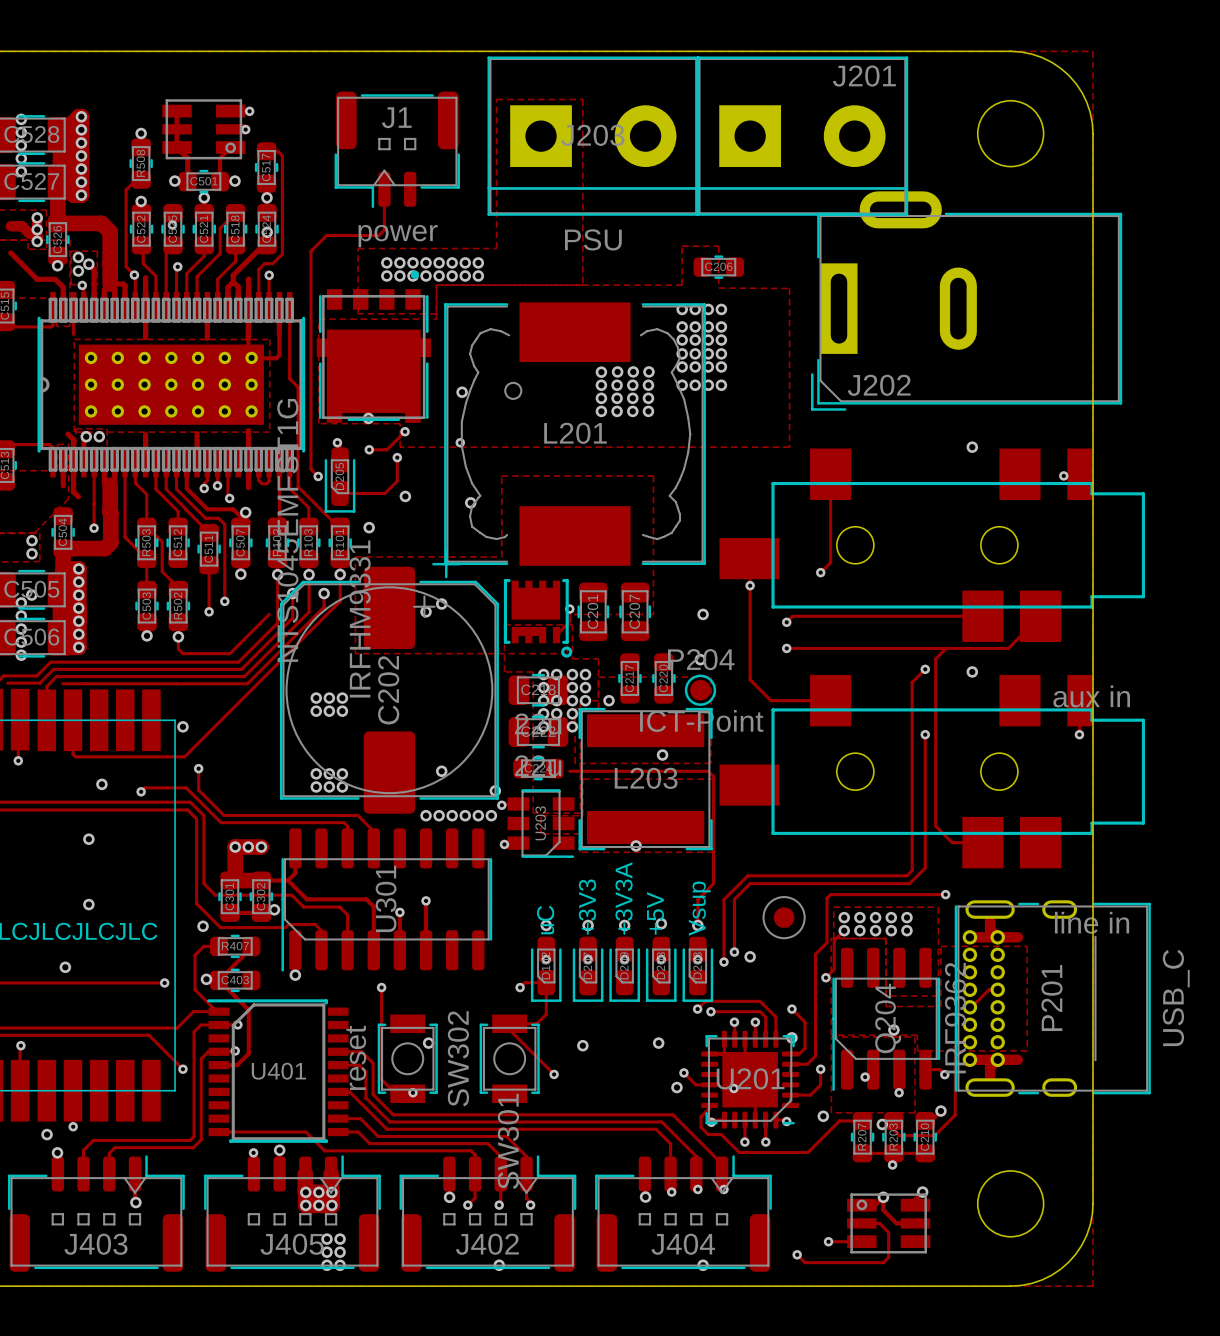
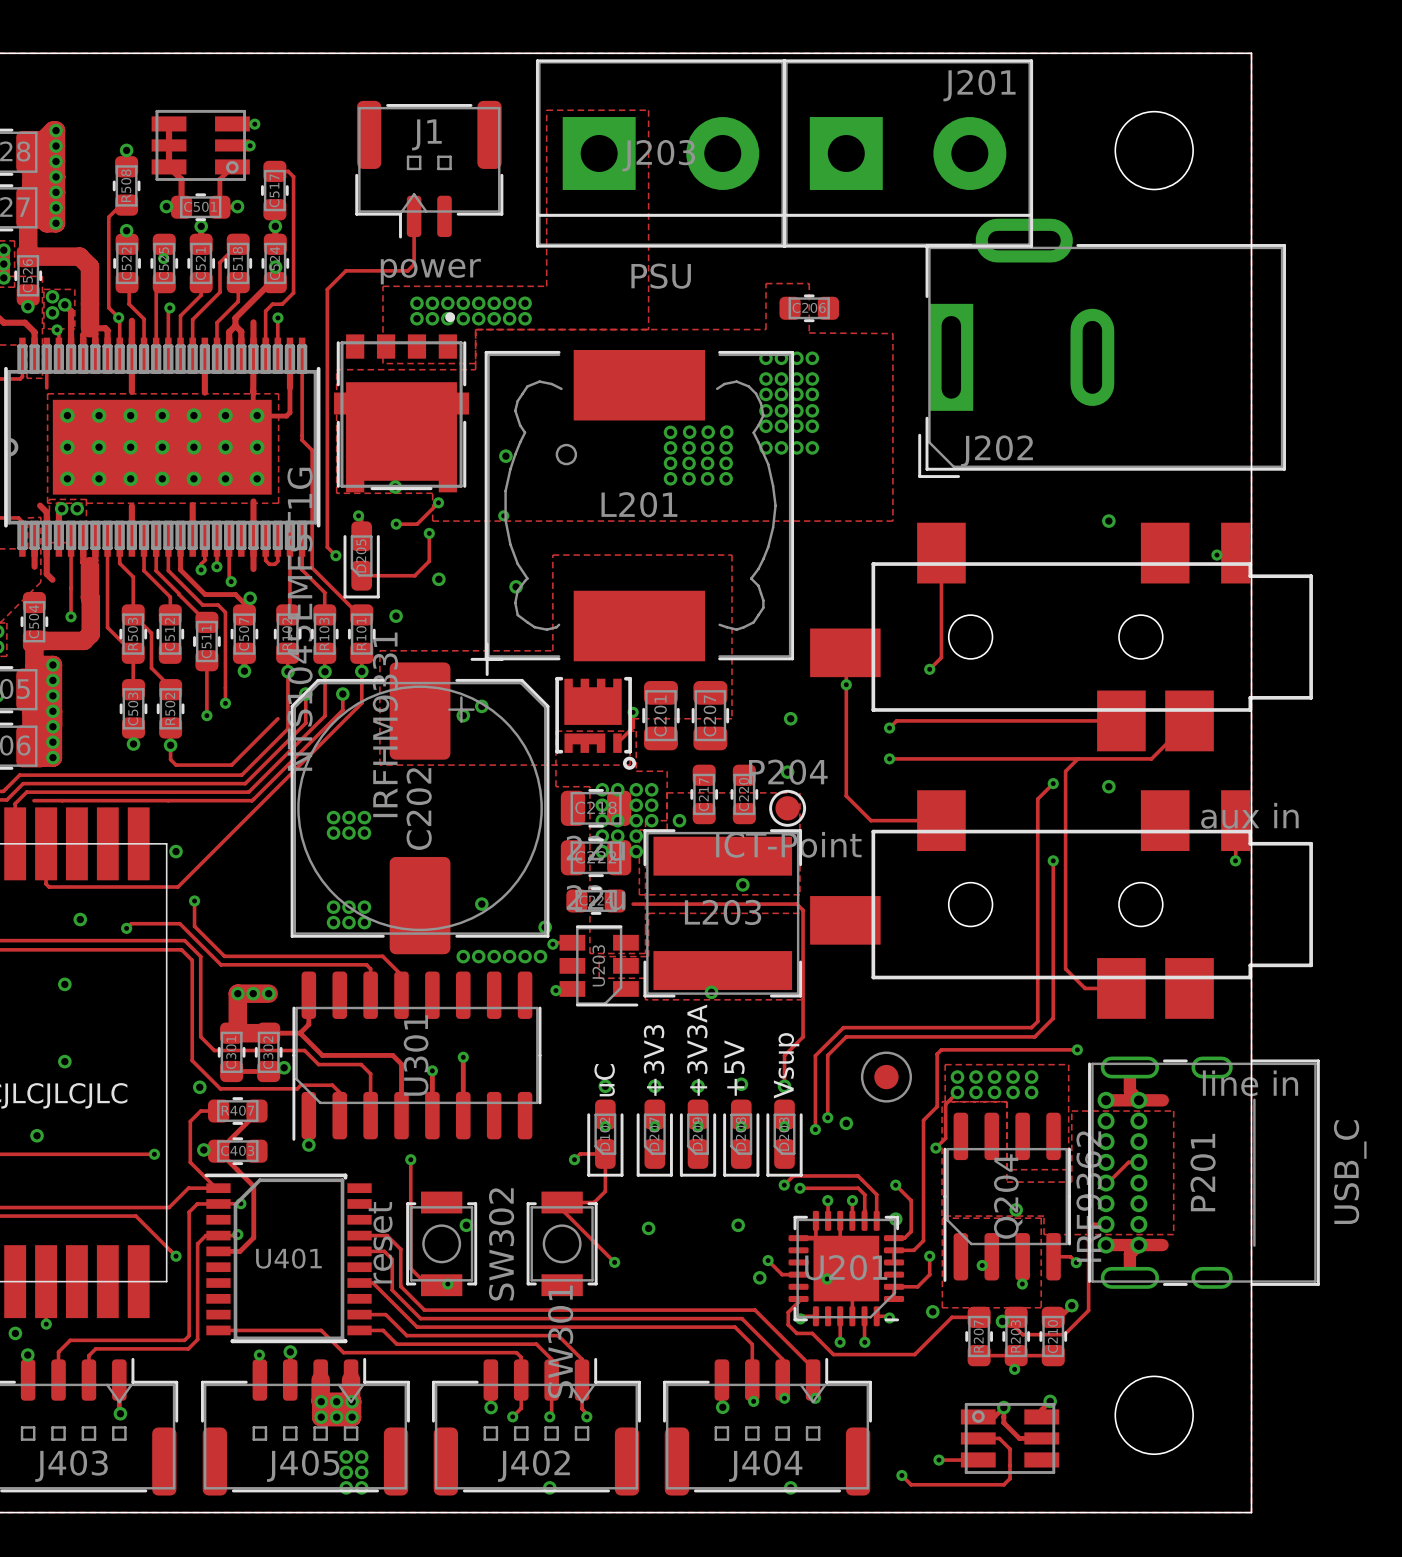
board edge: (1010, 51) (1042, 57) (1068, 75) (1086, 102) (1093, 133) -> (1154, 53) (1251, 53) (1251, 150)
board edge: (1093, 1203) (1086, 1235) (1068, 1262) (1042, 1279) (1010, 1286) -> (1251, 1415) (1251, 1512) (1154, 1512)

